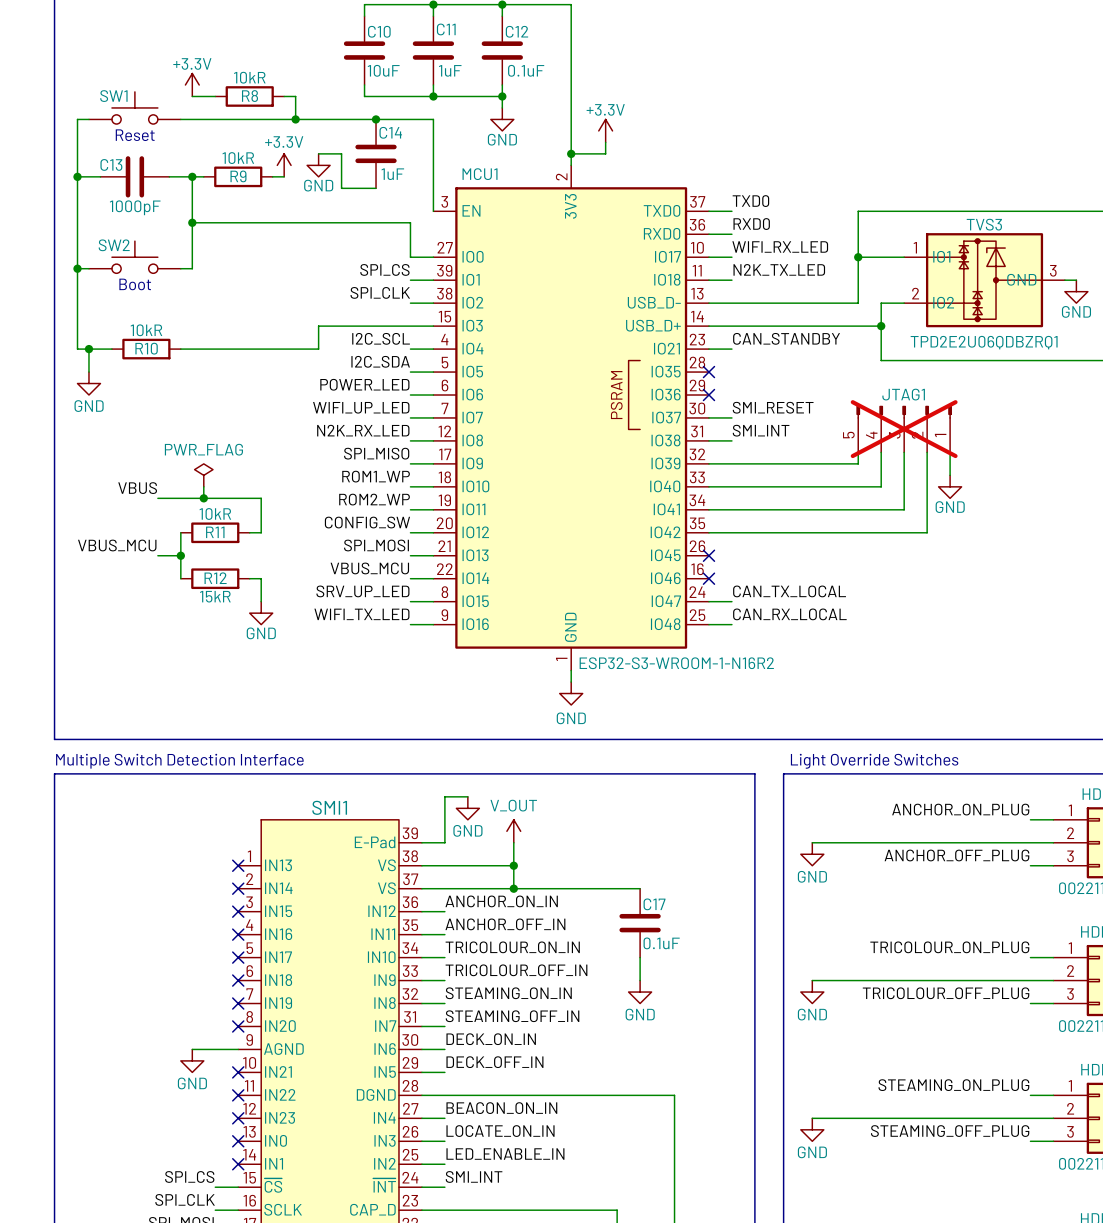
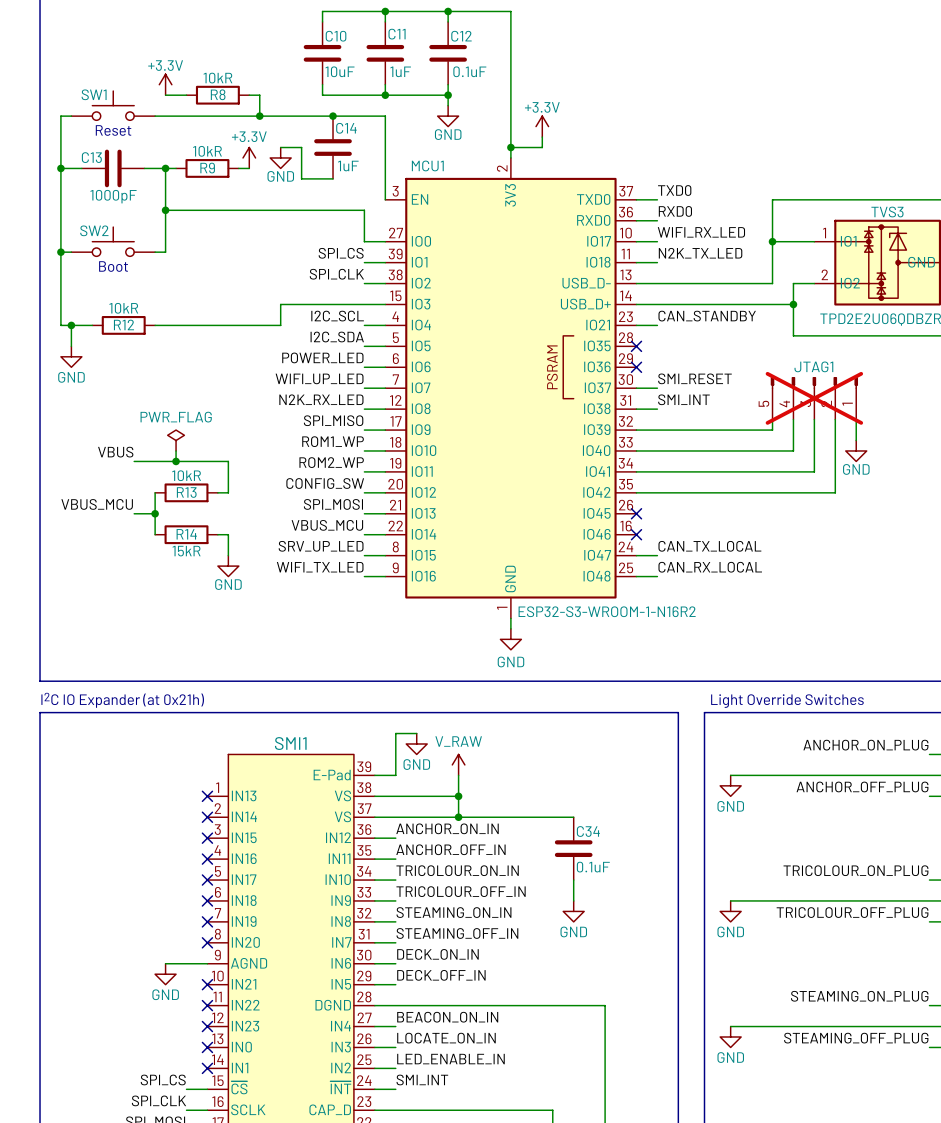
R10 name: R10 (146, 348) -> R12 (123, 324)
R11 name: R11 (215, 532) -> R13 (186, 492)
R12 name: R12 (215, 578) -> R14 (186, 534)
text: Multiple Switch Detection Interface (179, 761) -> I2C IO Expander (at 0x21h) (122, 700)
power symbol: V_OUT (513, 831) -> V_RAW (458, 764)
C17 name: C17 (654, 904) -> C34 (588, 831)

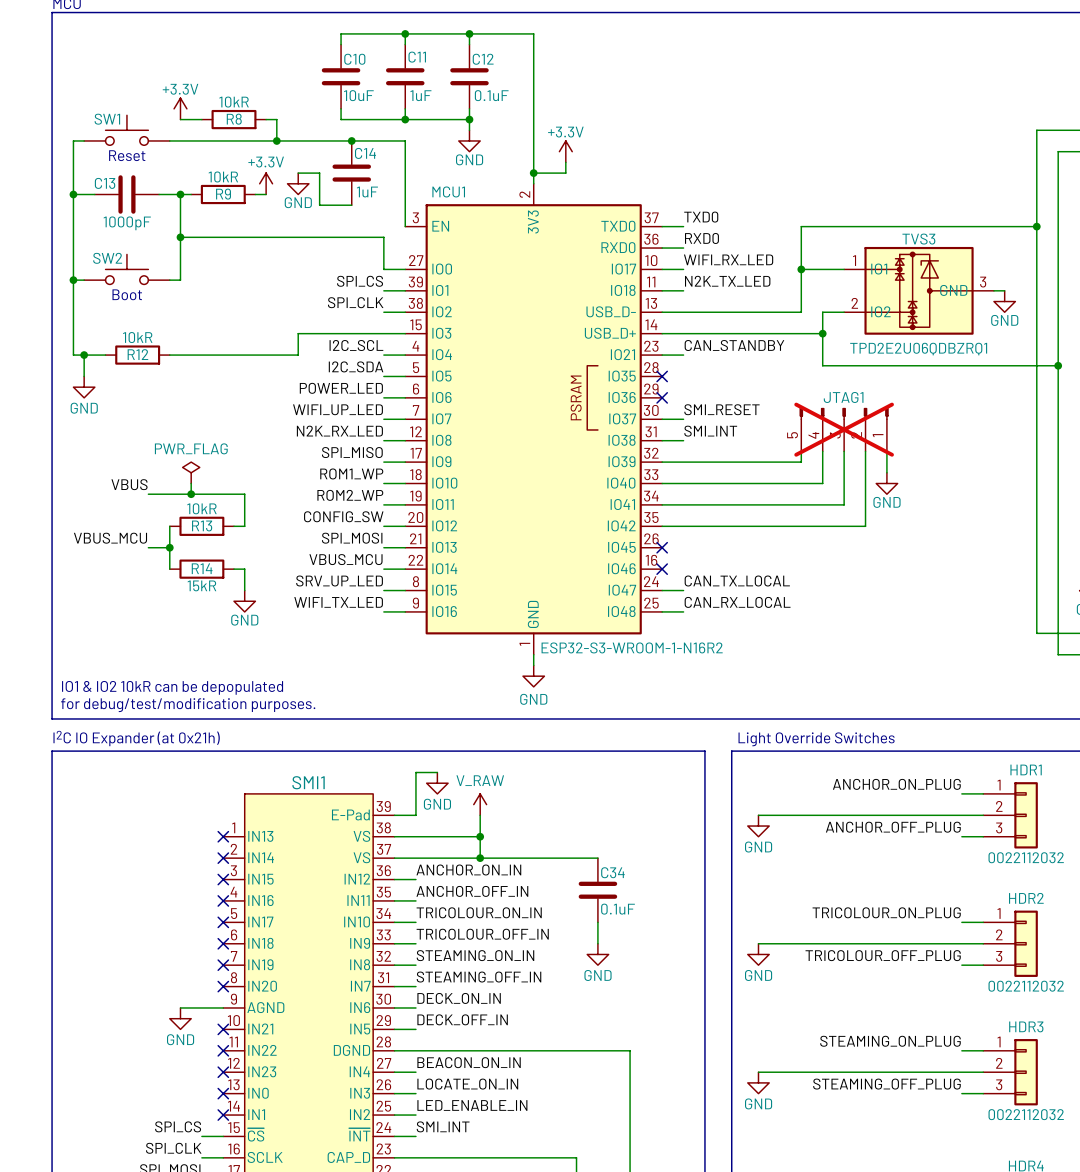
text: none -> IO1 & IO2 10kR can be depopulated (172, 687)
text: none -> for debug/test/modification purposes. (188, 705)

